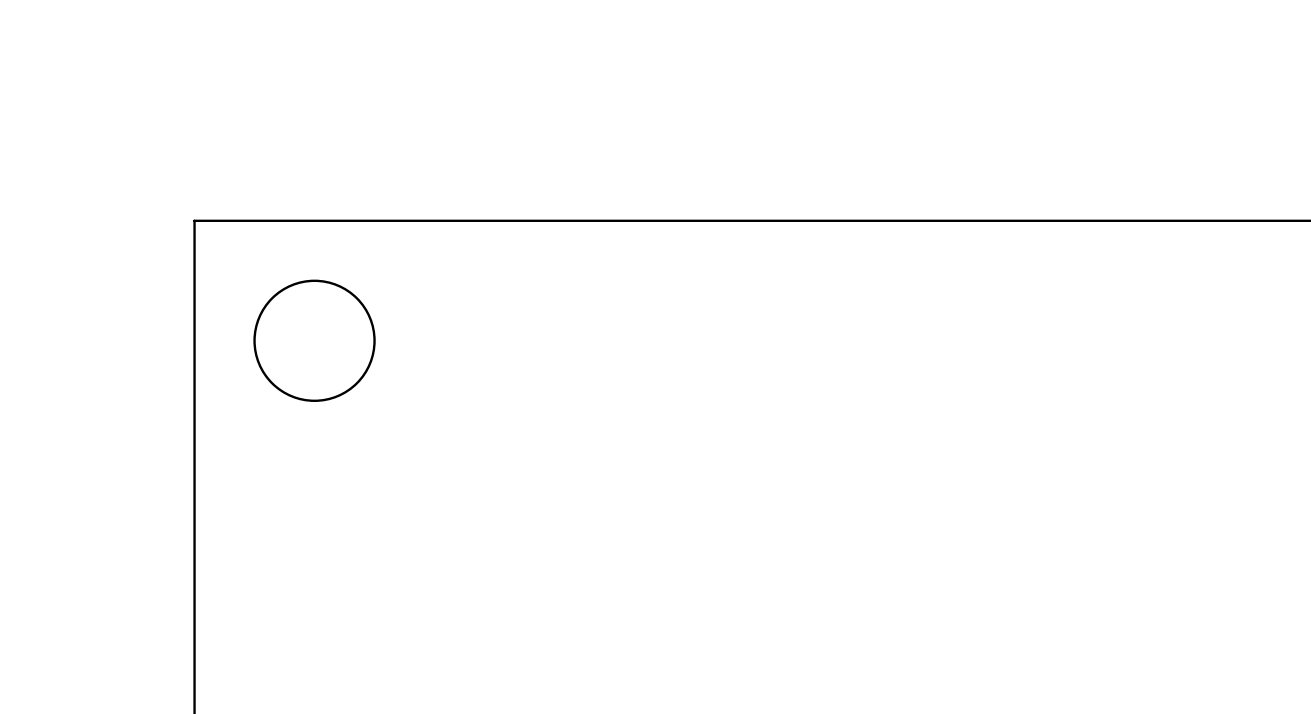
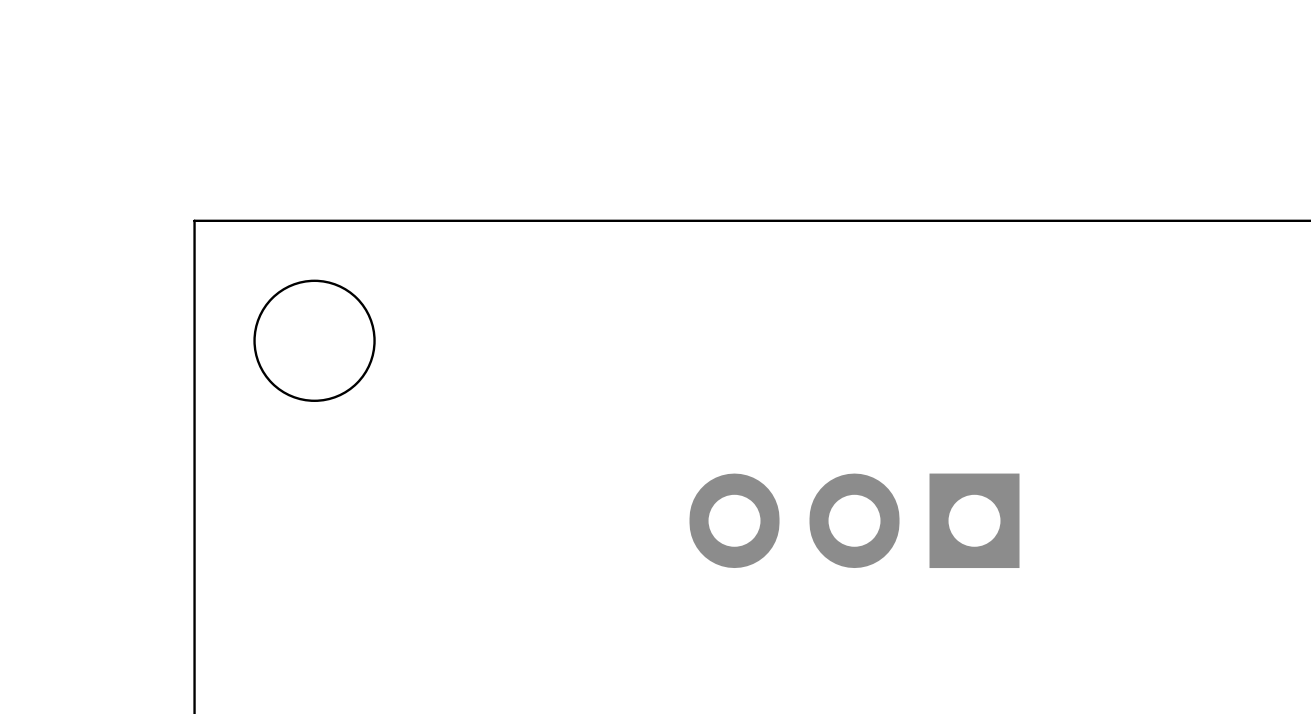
part: none -> (854, 520)

